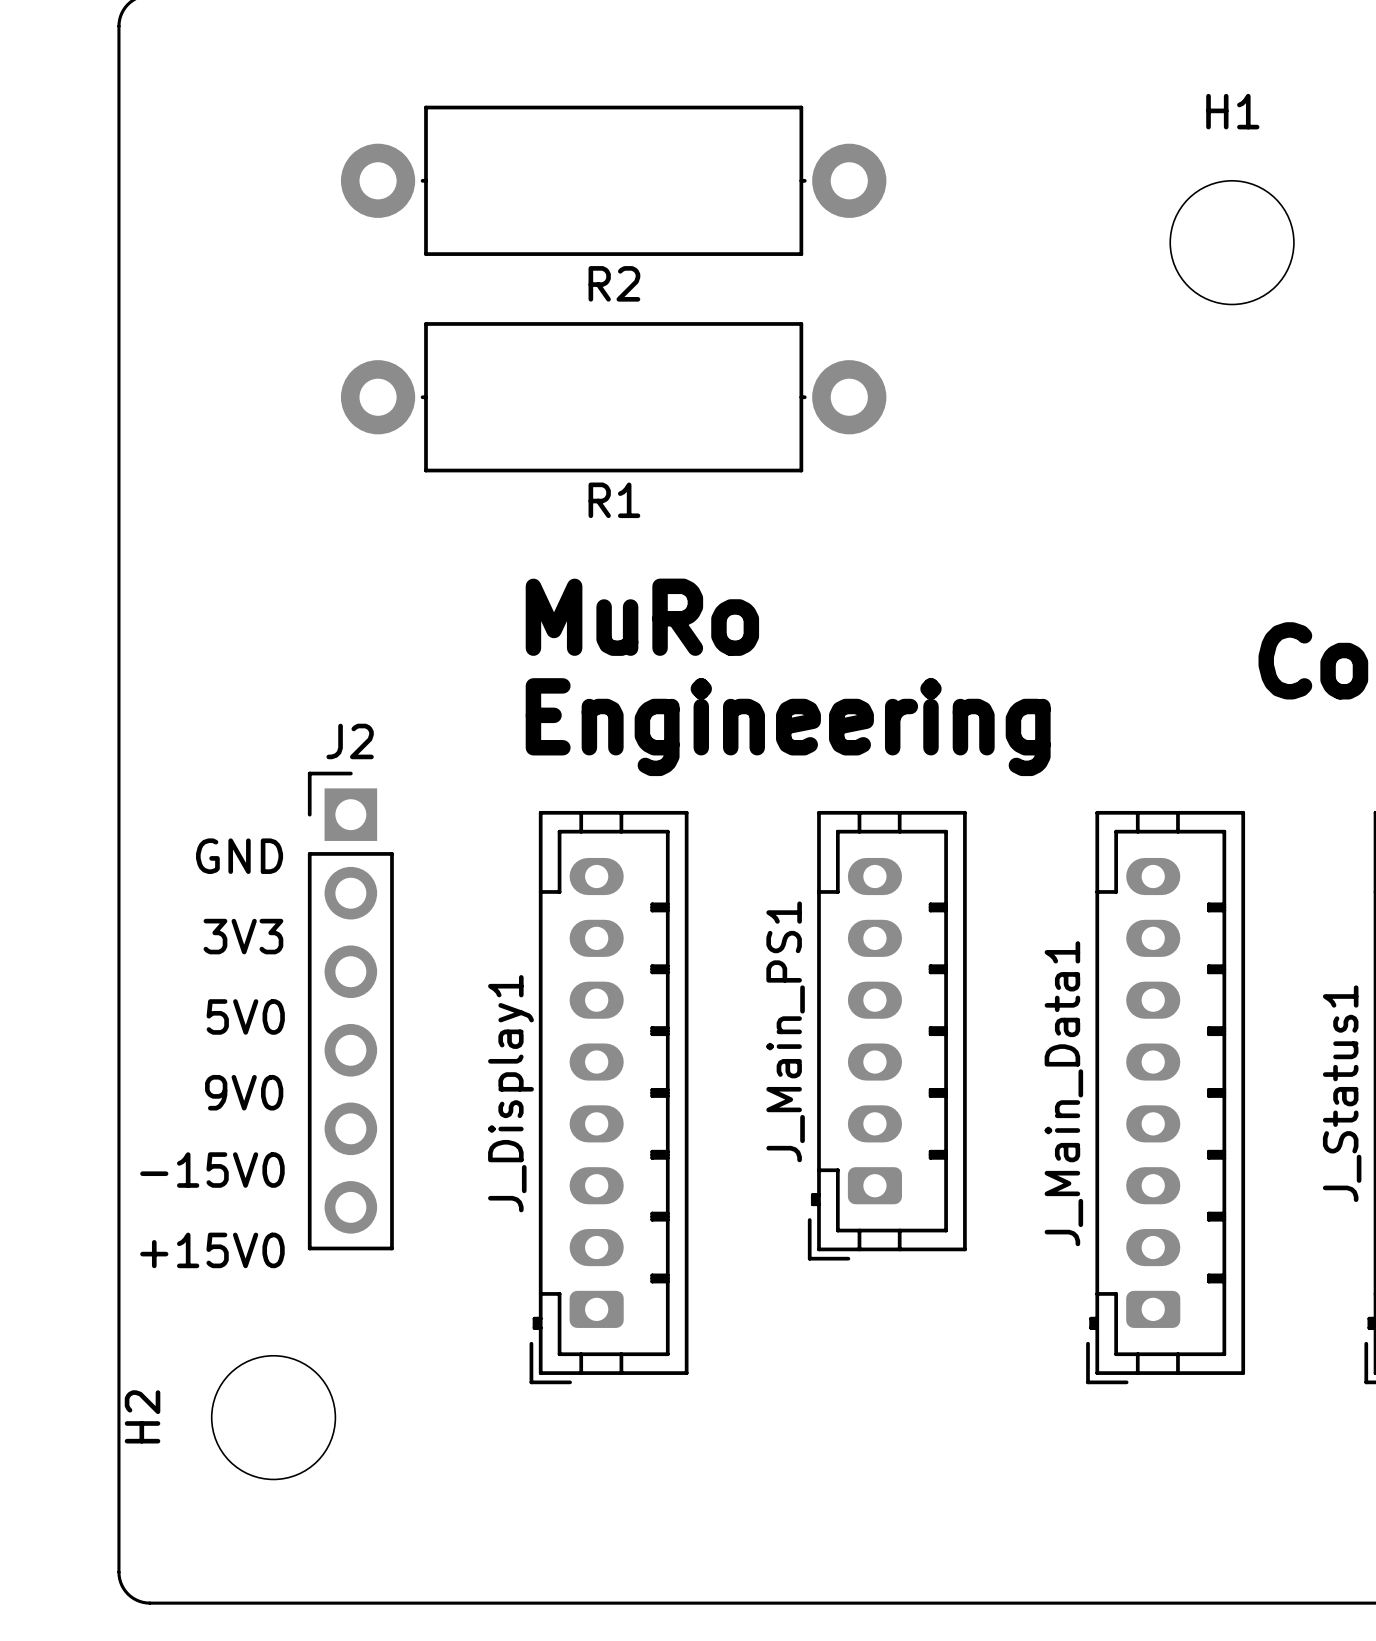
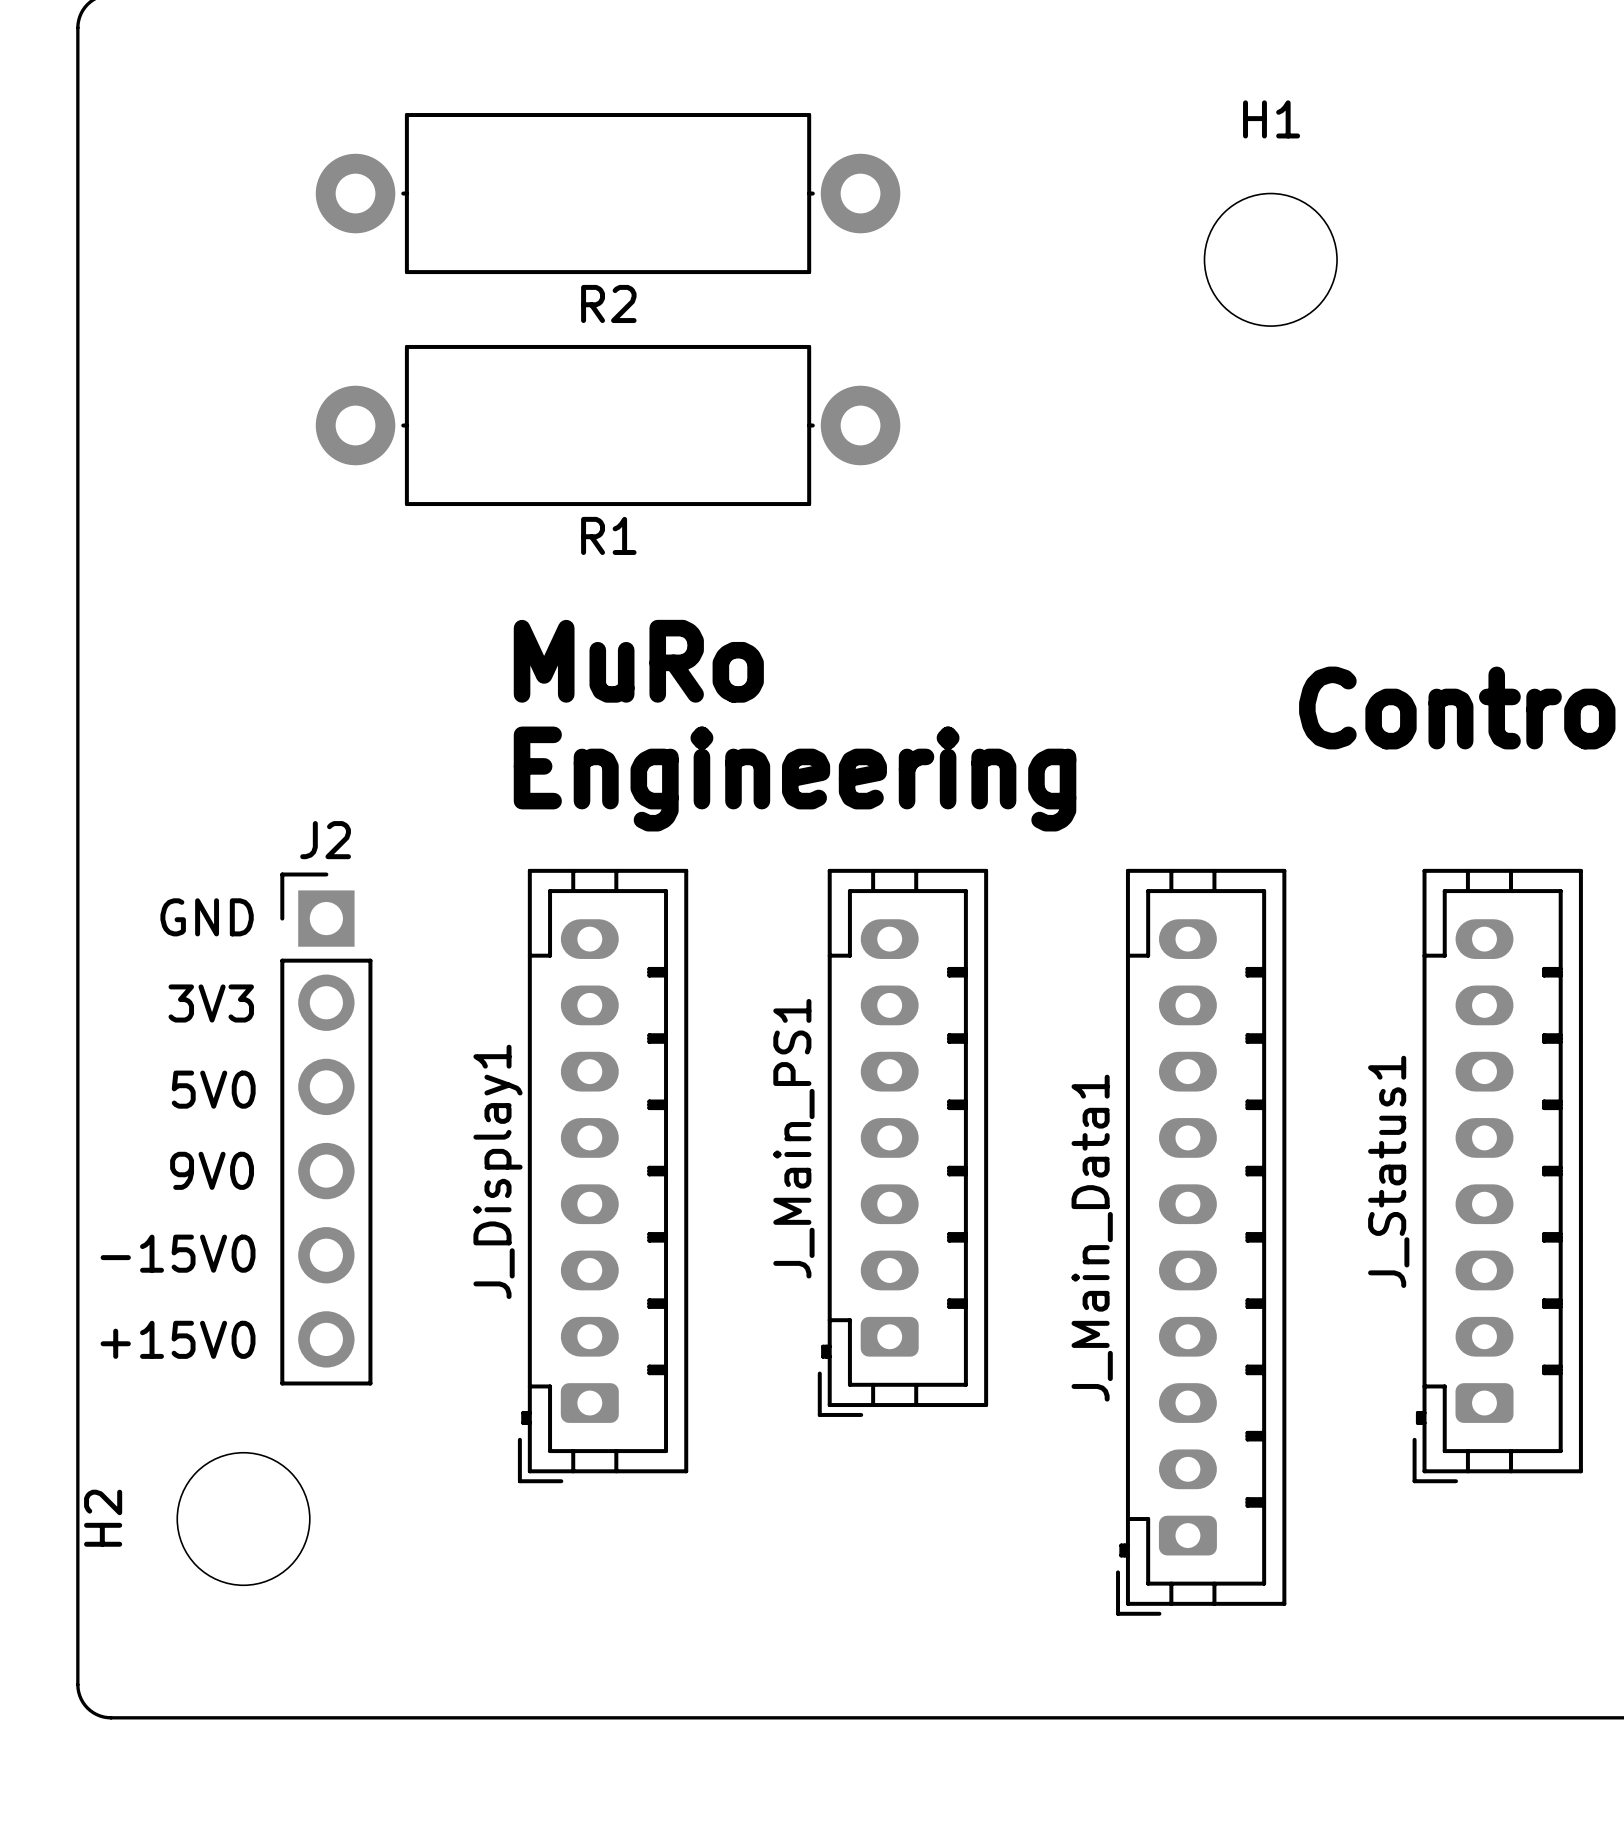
J_Main_PS1 footprint: [807, 810, 967, 1261] -> [817, 868, 989, 1417]
J_Main_Data1 footprint: [1086, 810, 1246, 1385] -> [1116, 868, 1287, 1616]
J2 position: (350, 1011) -> (326, 1128)

